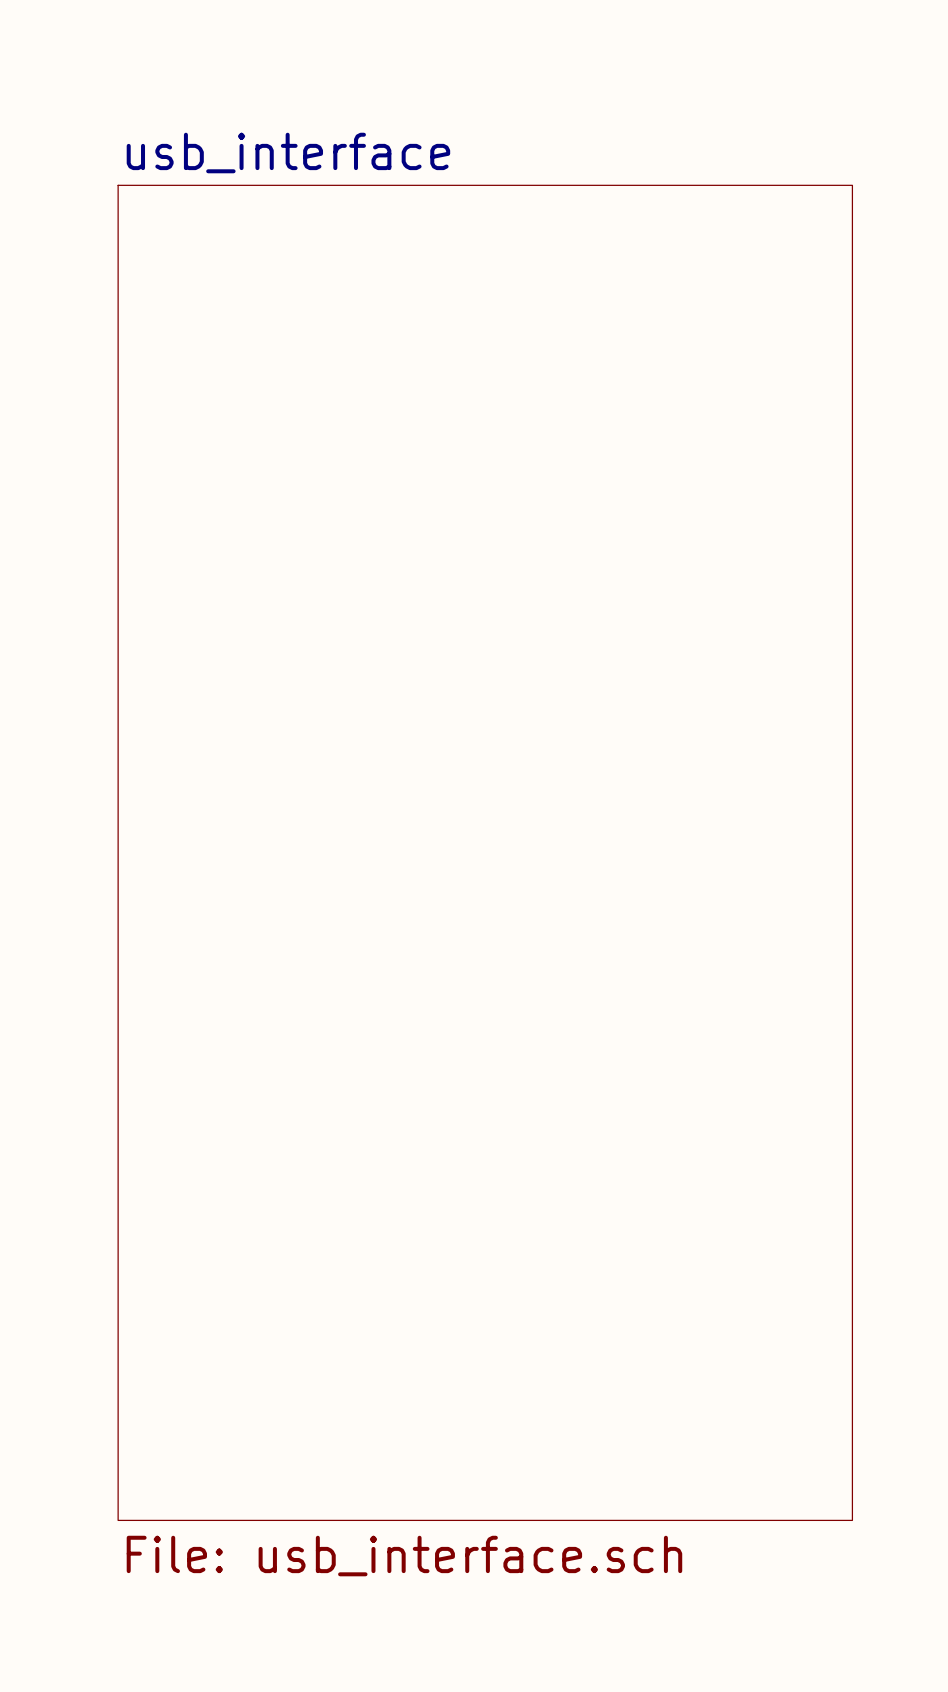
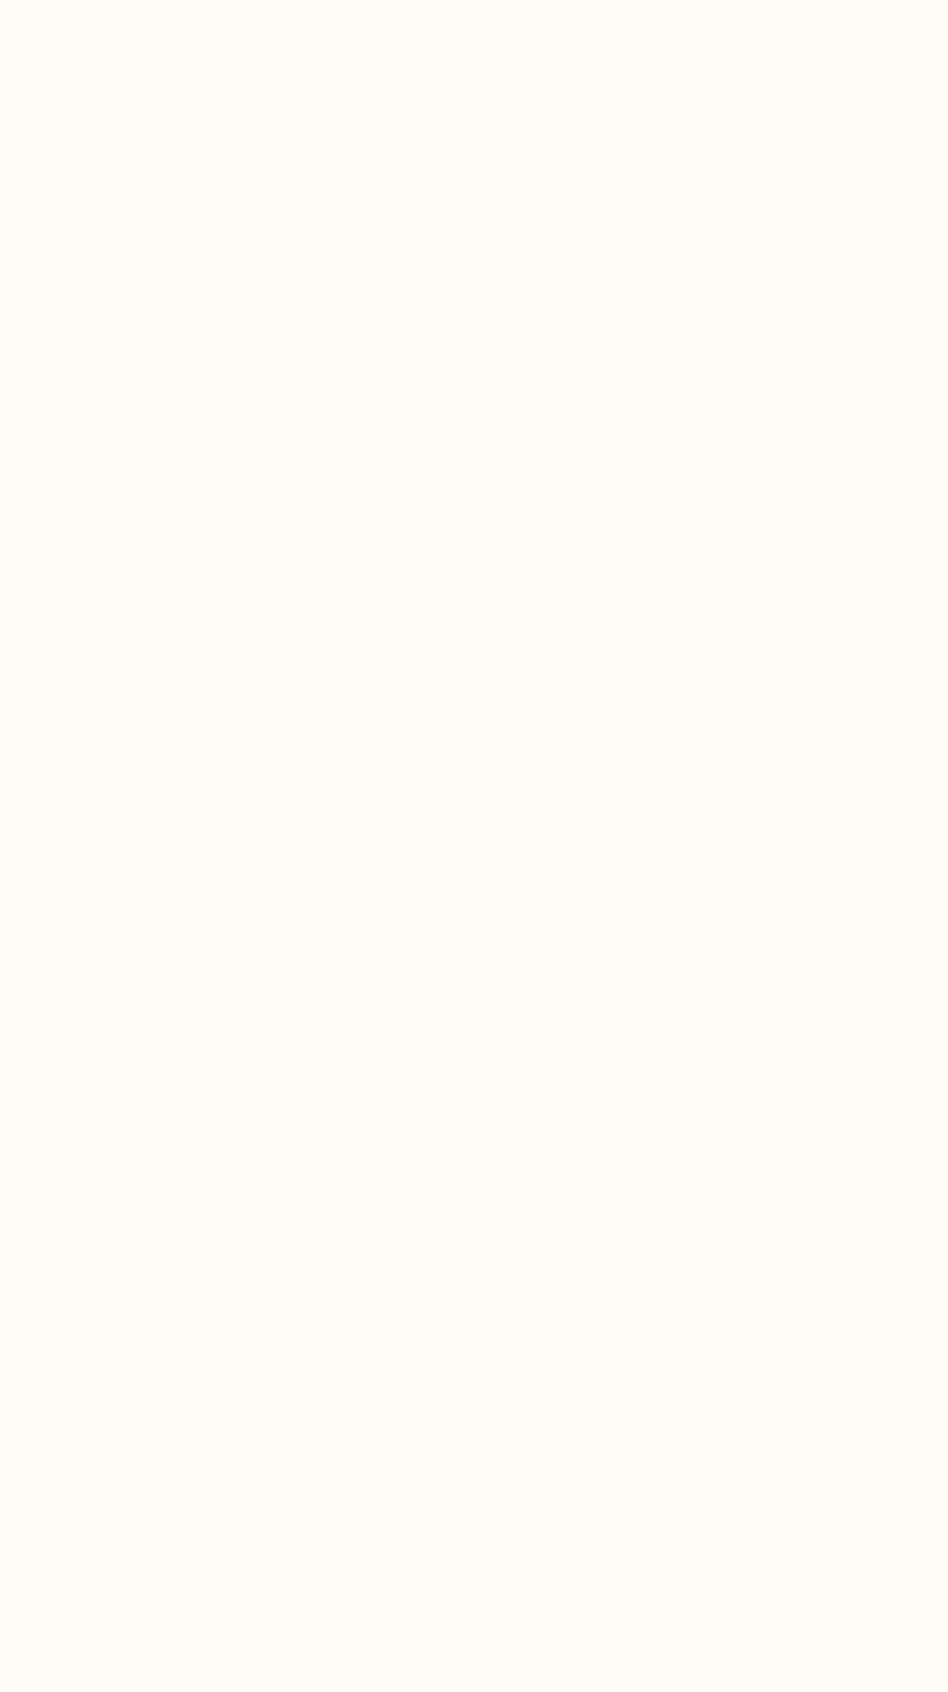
sheet usb_interface: File: usb_interface.sch (485, 852) -> none

